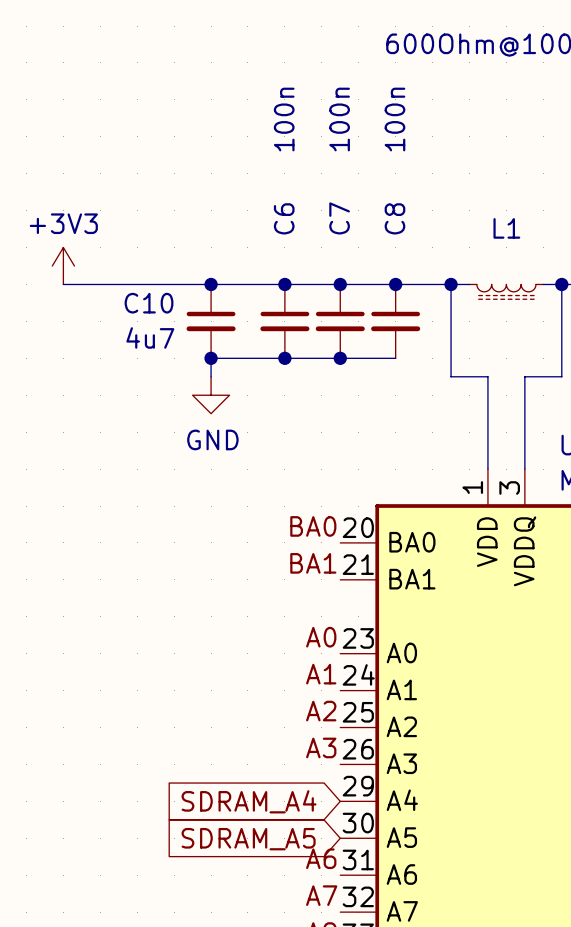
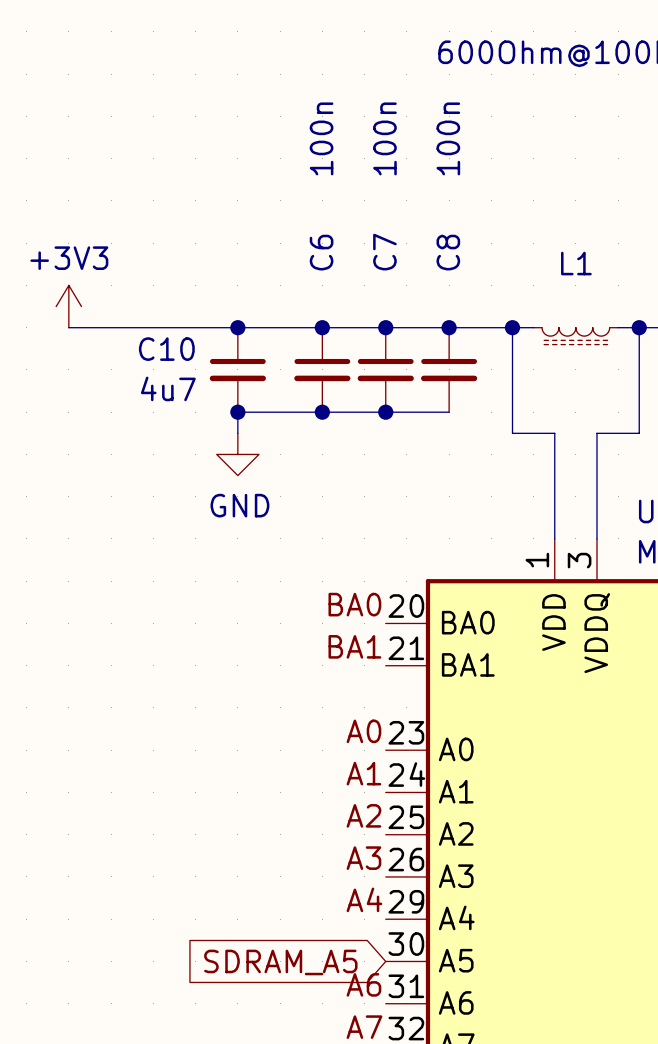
label: none -> A4 (364, 899)
global label: SDRAM_A4 (249, 801) -> none

